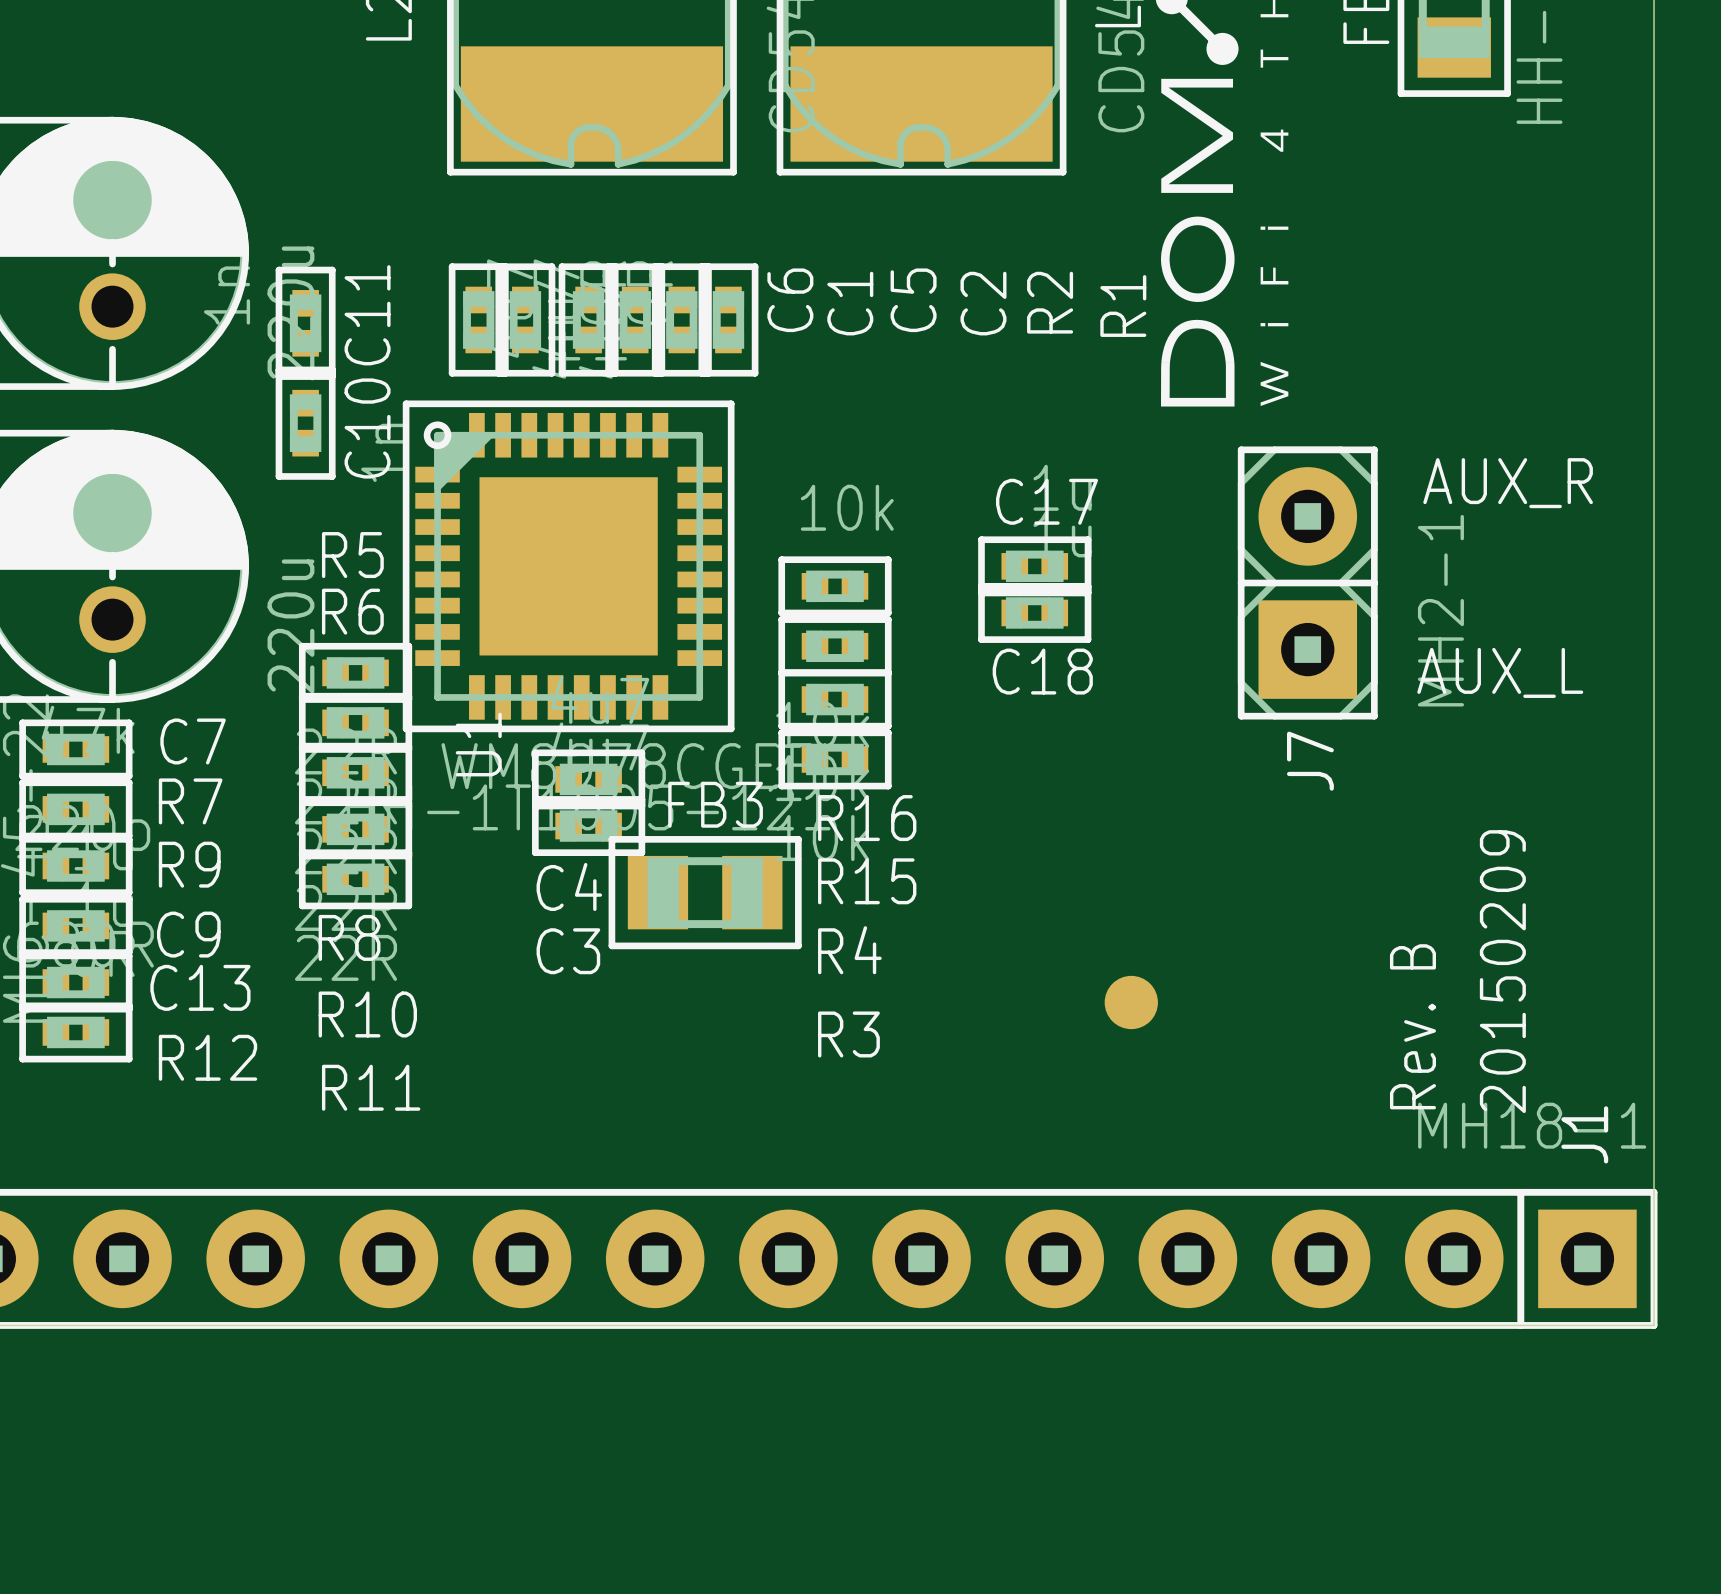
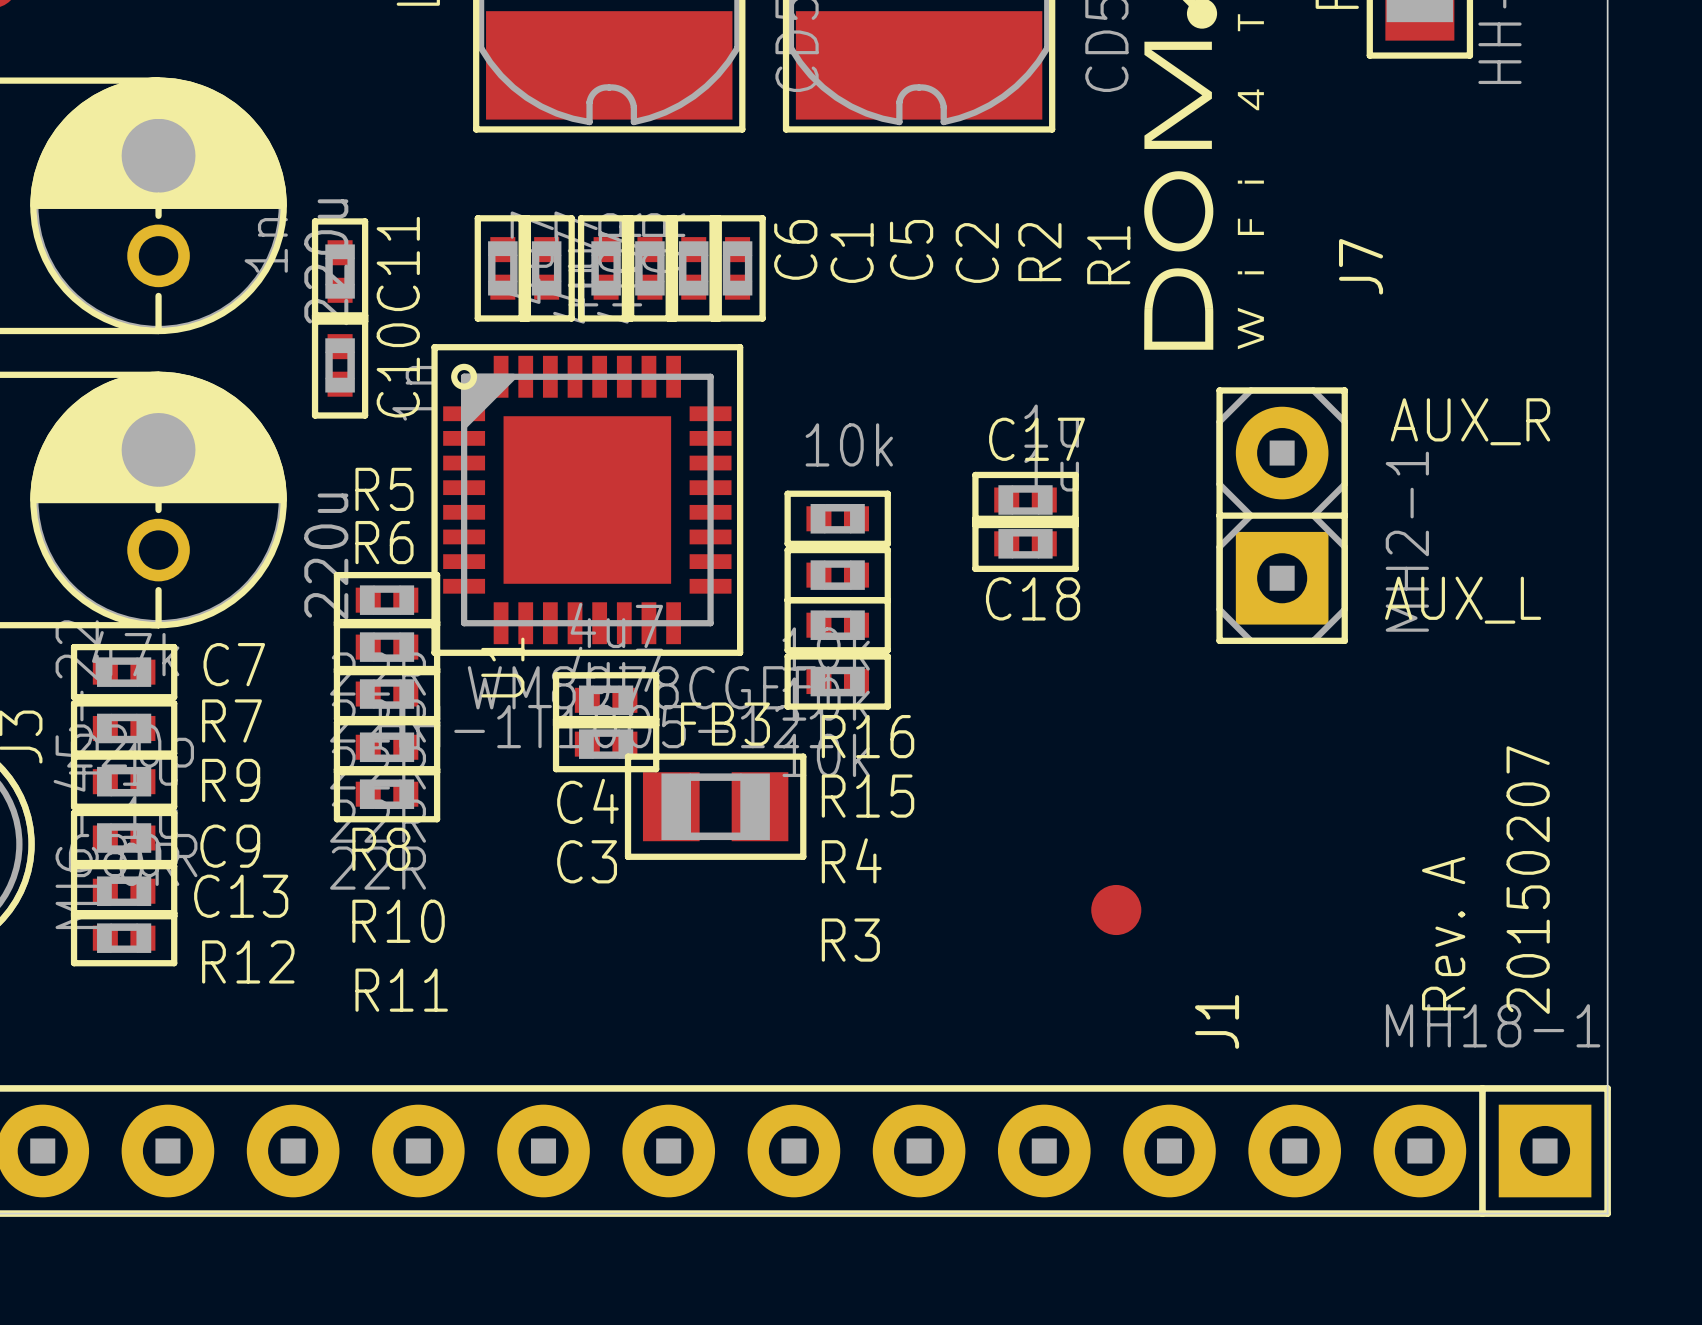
J7 name position: J7 (1310, 761) -> J7 (1361, 266)
text: B (1412, 956) -> none
text: none -> A (1443, 870)
text: none -> 20150207 (1528, 880)
text: 20150209 (1502, 971) -> Rev. (1443, 960)
text: Rev. (1412, 1056) -> none
J1 name position: J1 (1584, 1134) -> J1 (1217, 1021)

